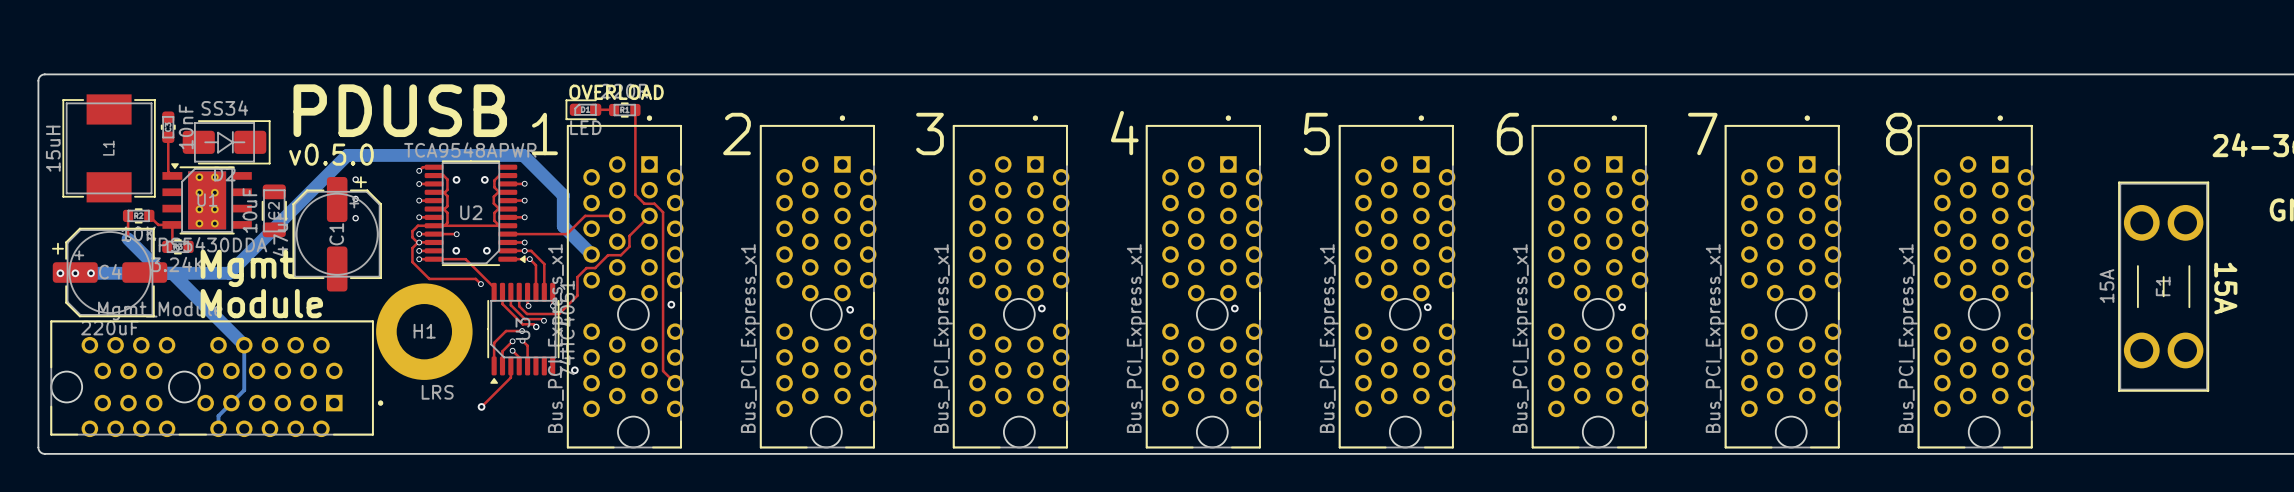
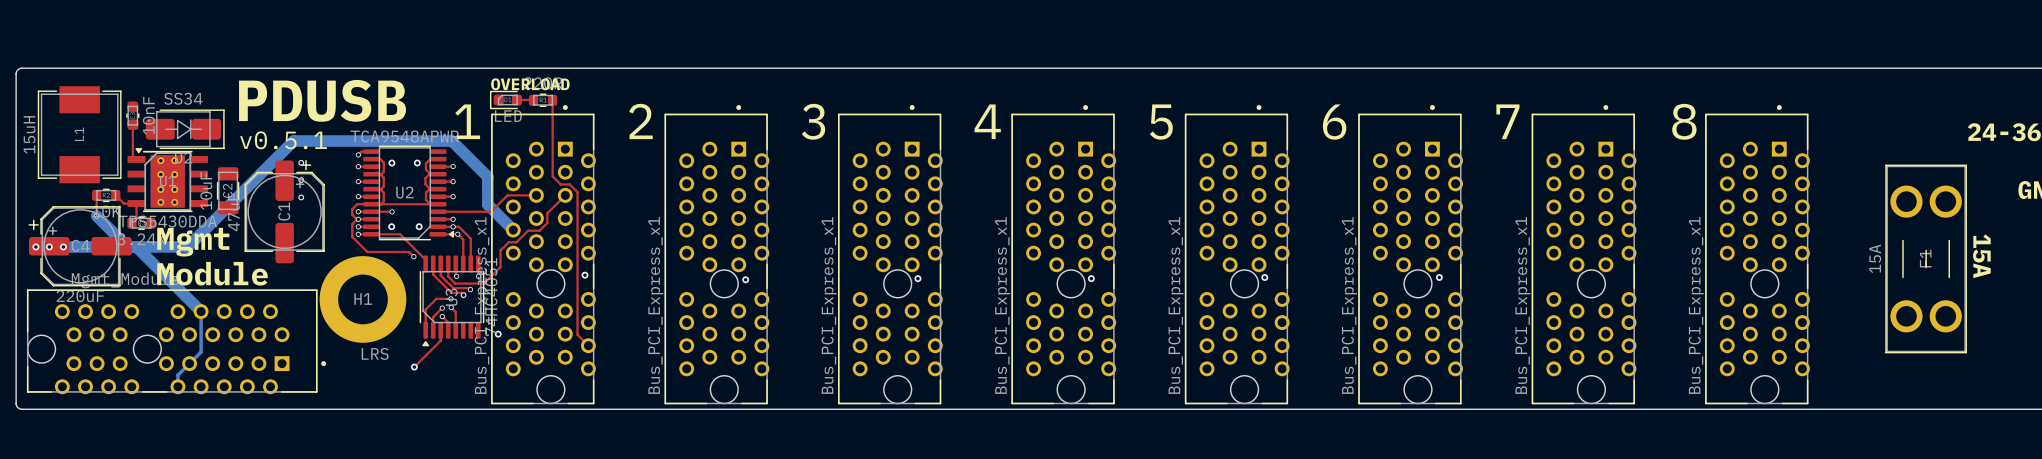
text: v0.5.0 (331, 154) -> v0.5.1 (283, 140)

